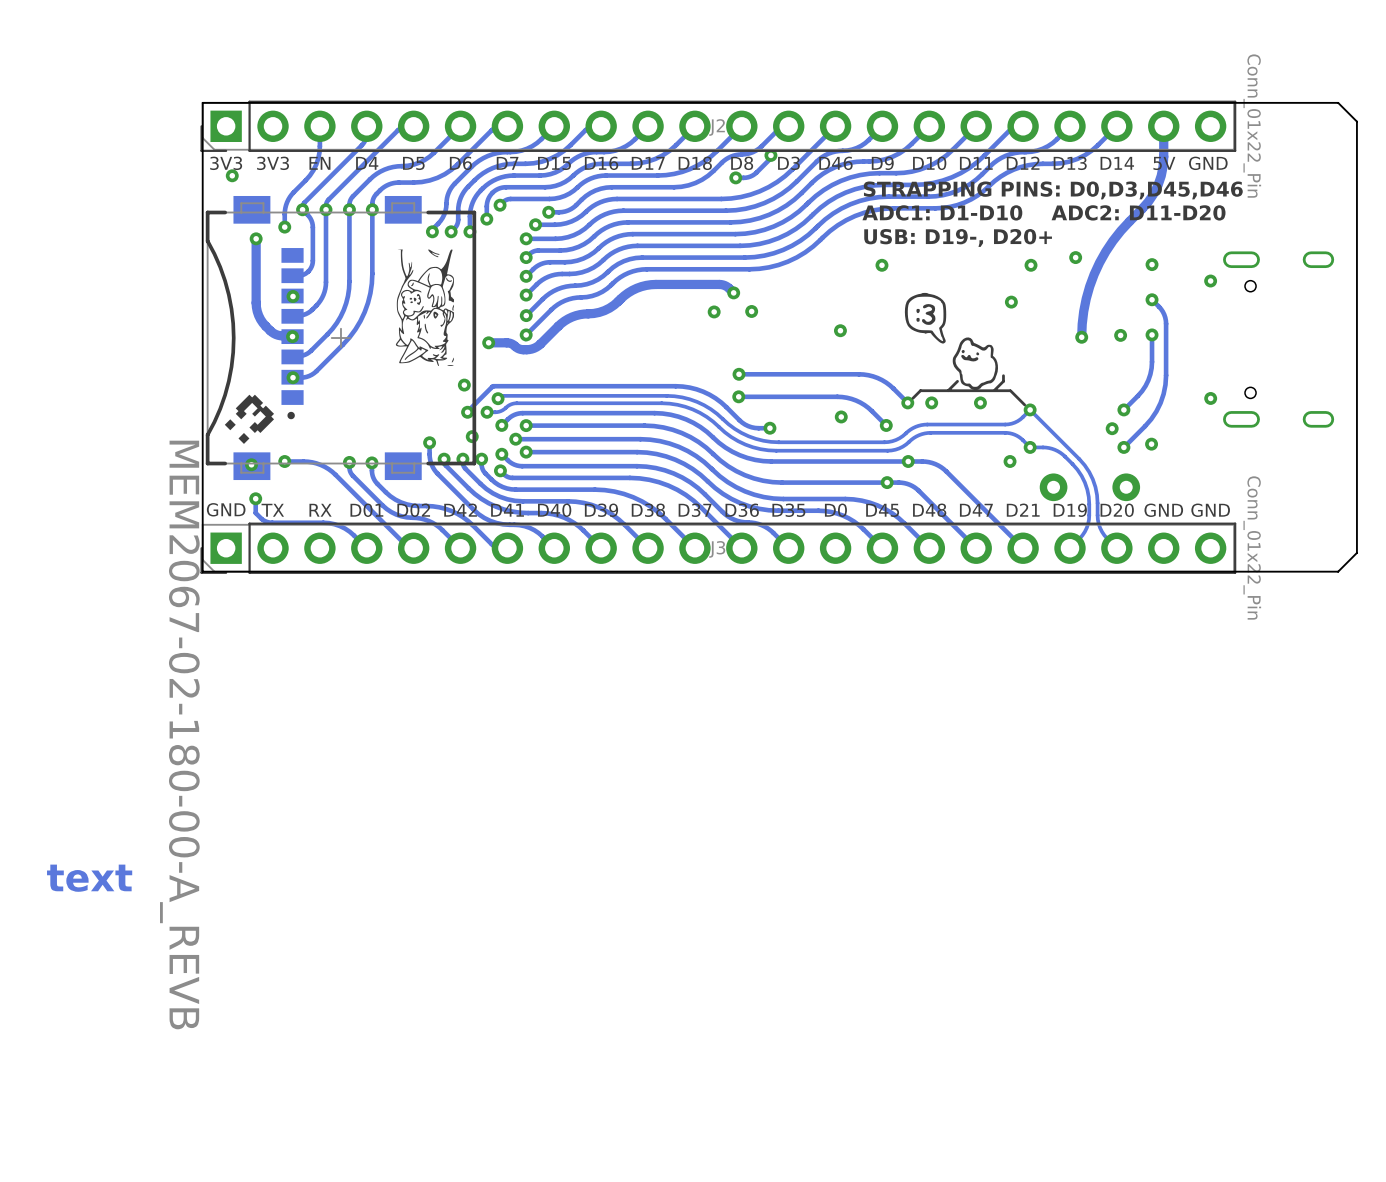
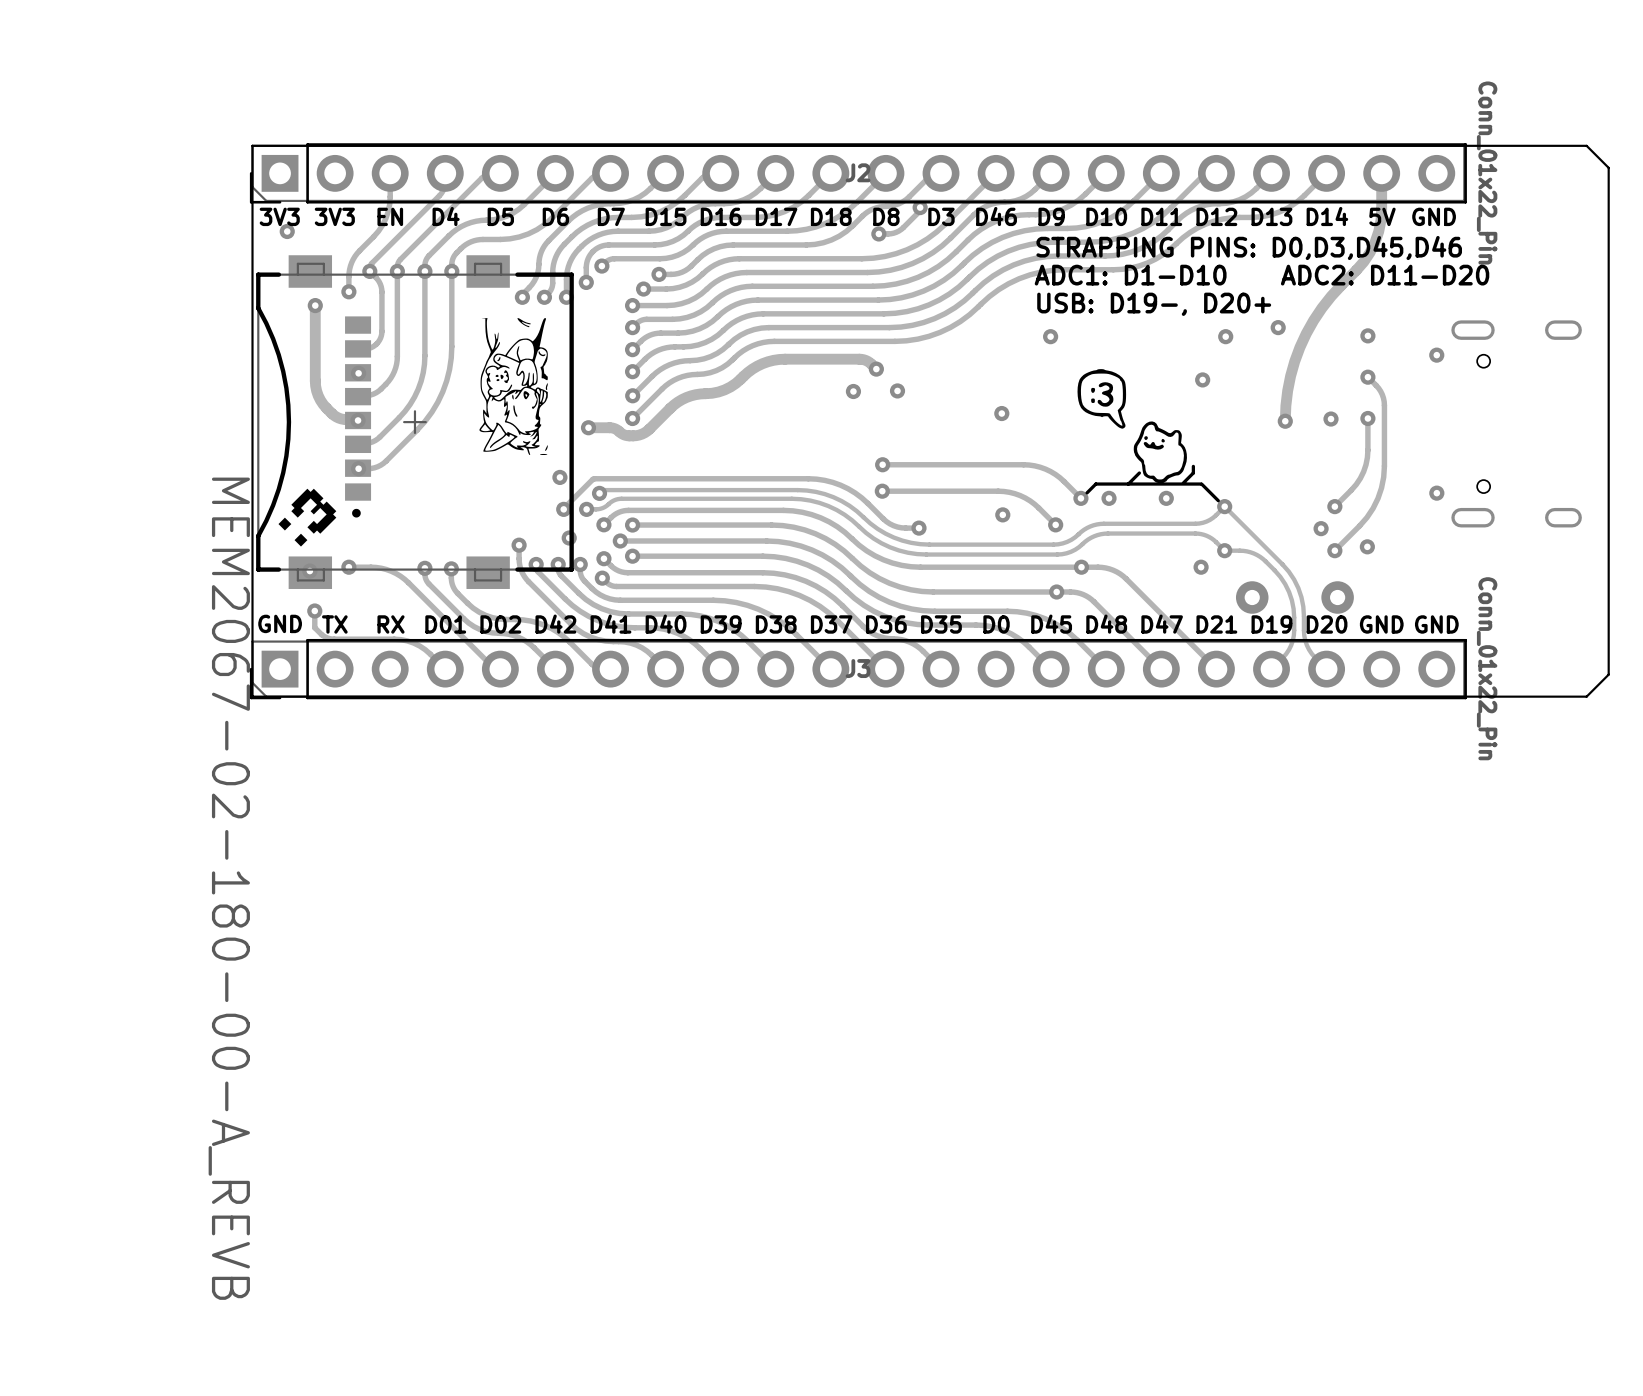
text: text (89, 878) -> none

